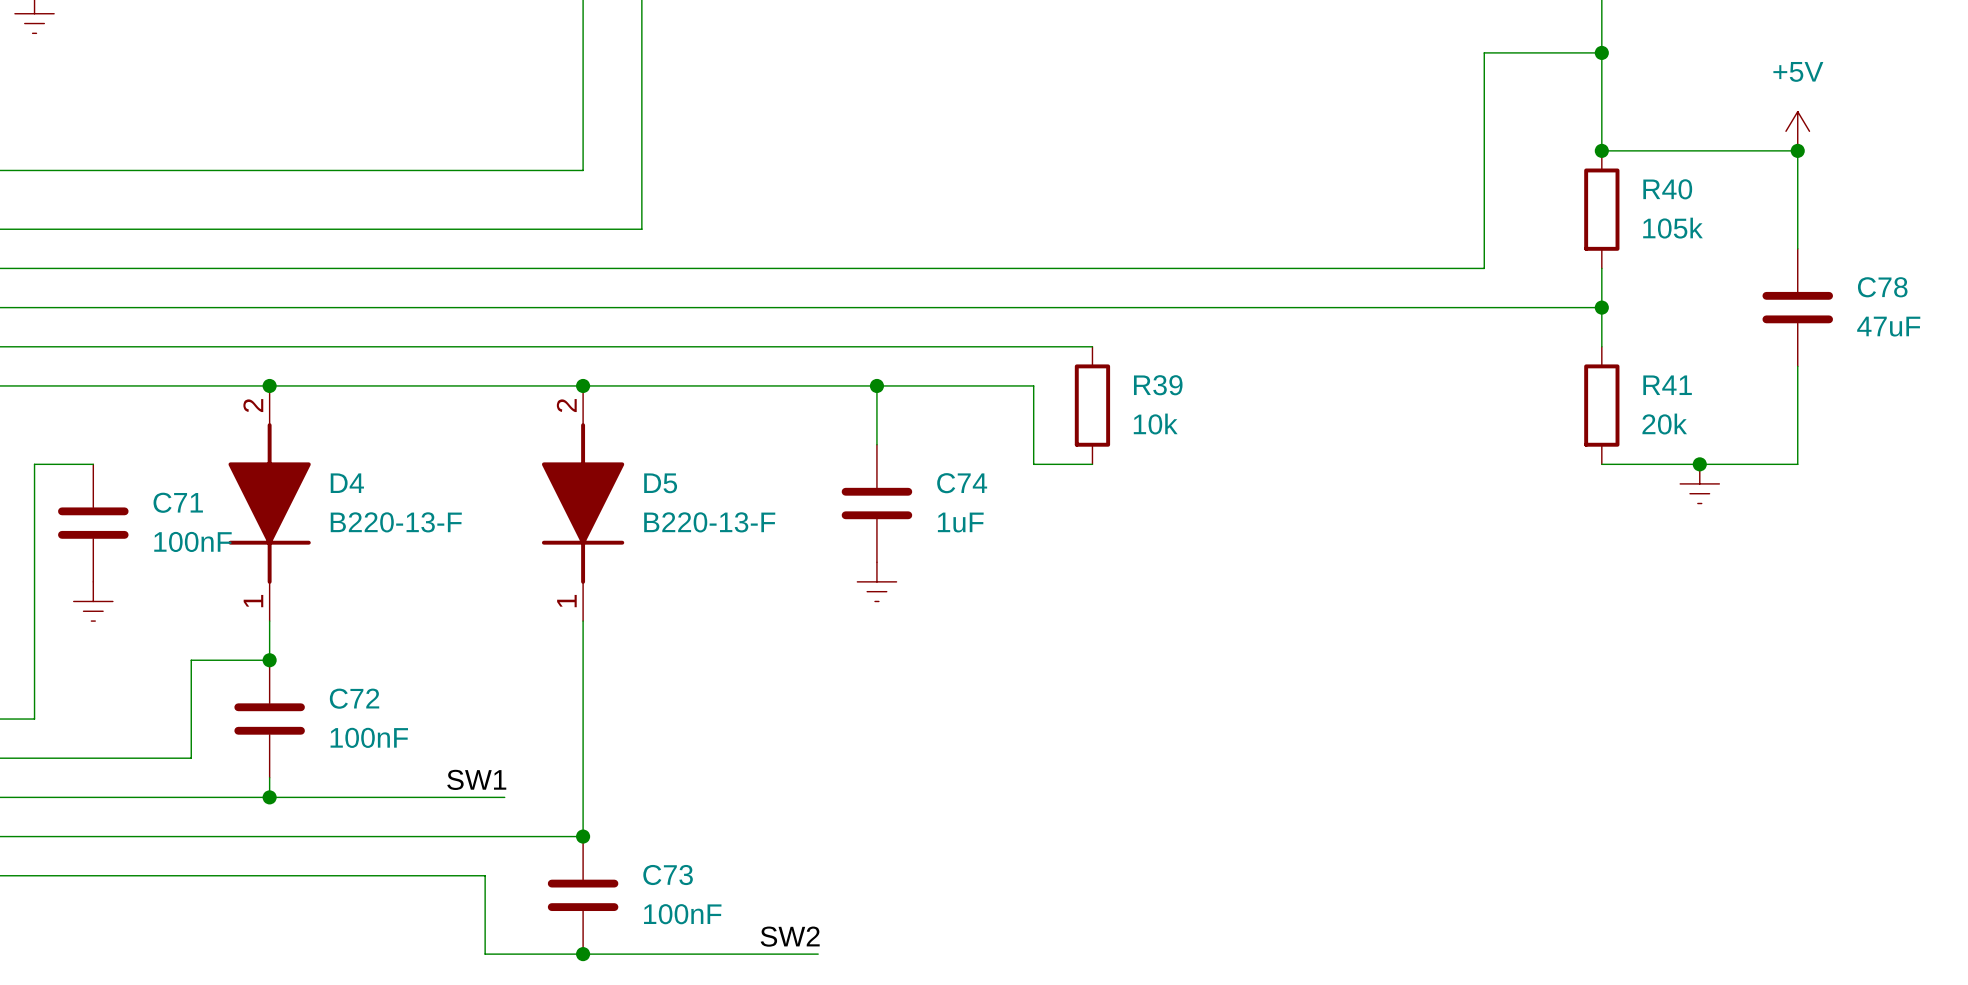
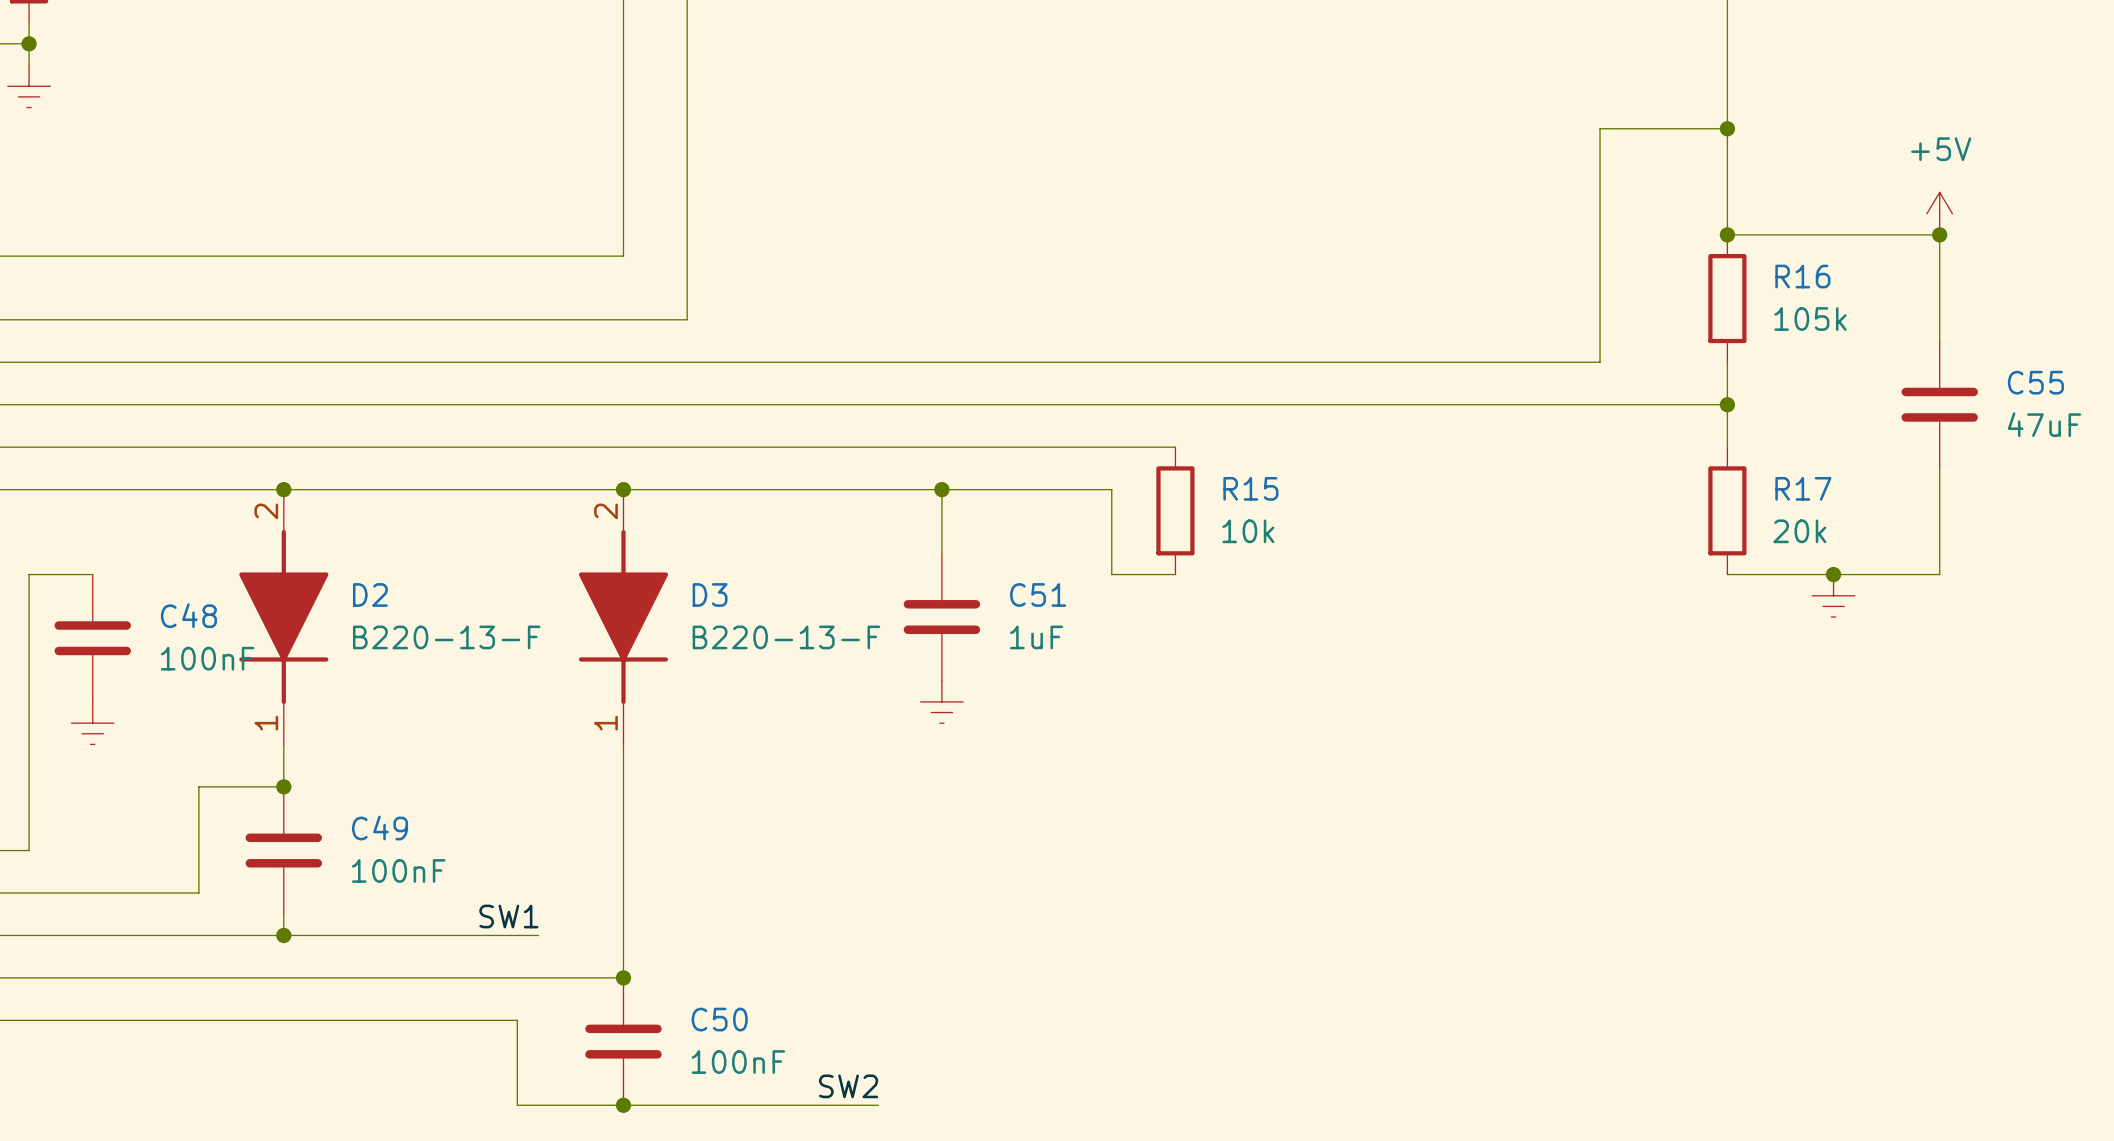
R40 name: R40 (1667, 189) -> R16 (1802, 276)
C78 name: C78 (1882, 287) -> C55 (2035, 382)
R39 name: R39 (1158, 385) -> R15 (1250, 488)
R41 name: R41 (1667, 385) -> R17 (1803, 488)
D4 name: D4 (347, 483) -> D2 (370, 594)
D5 name: D5 (660, 483) -> D3 (710, 594)
C74 name: C74 (962, 483) -> C51 (1038, 594)
C71 name: C71 (178, 502) -> C48 (188, 615)
C72 name: C72 (354, 698) -> C49 (380, 828)
C73 name: C73 (668, 875) -> C50 (719, 1019)

